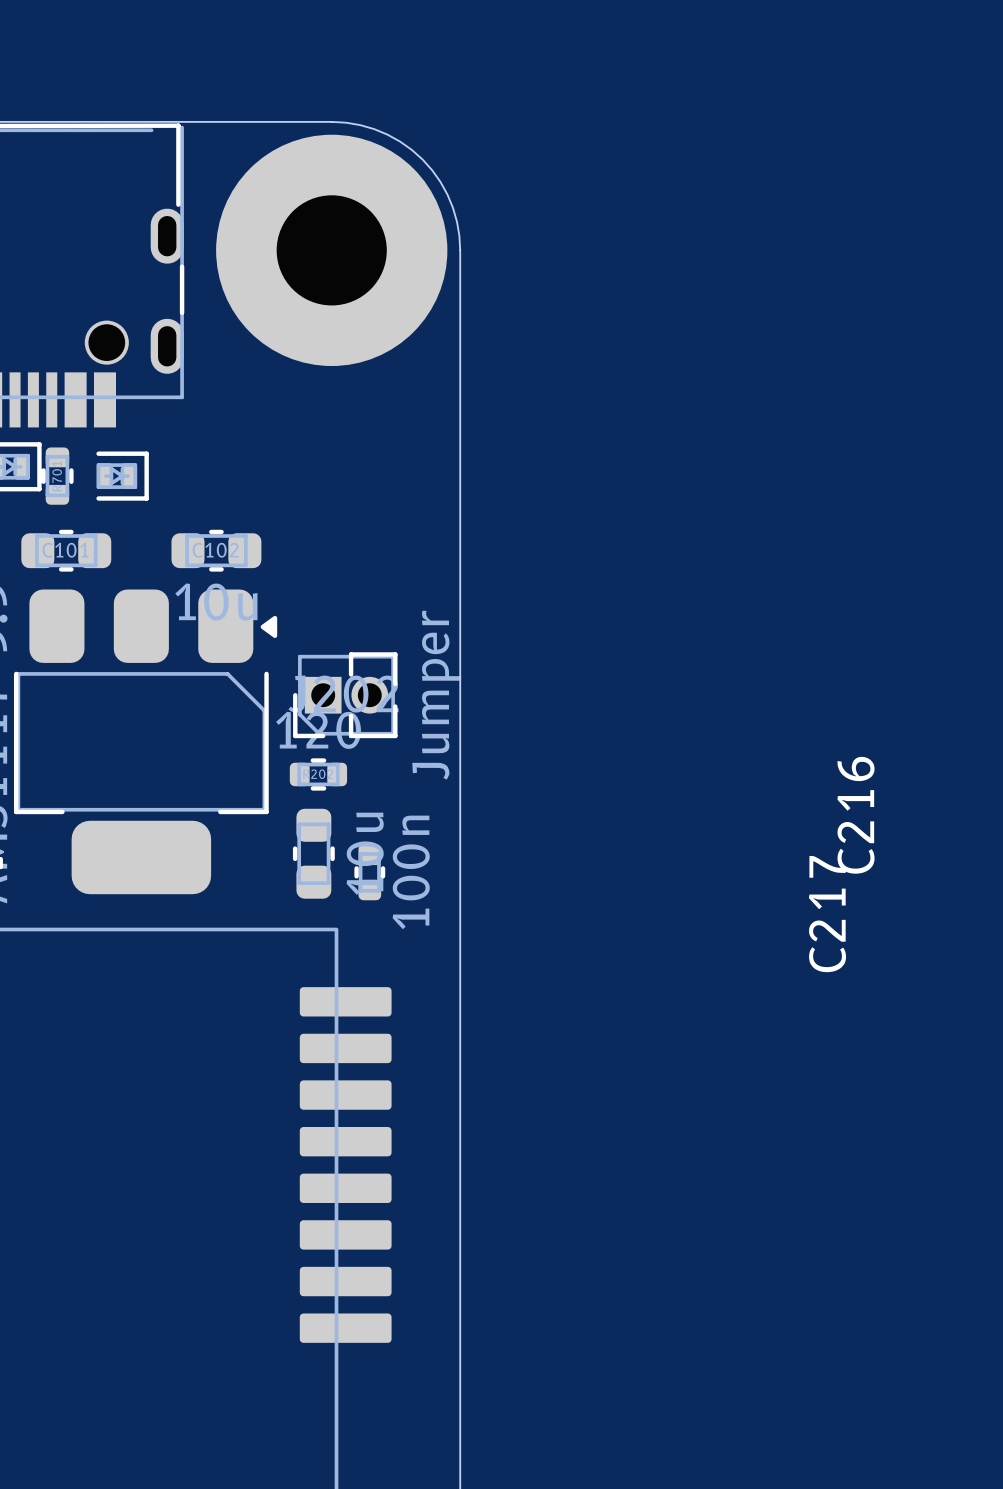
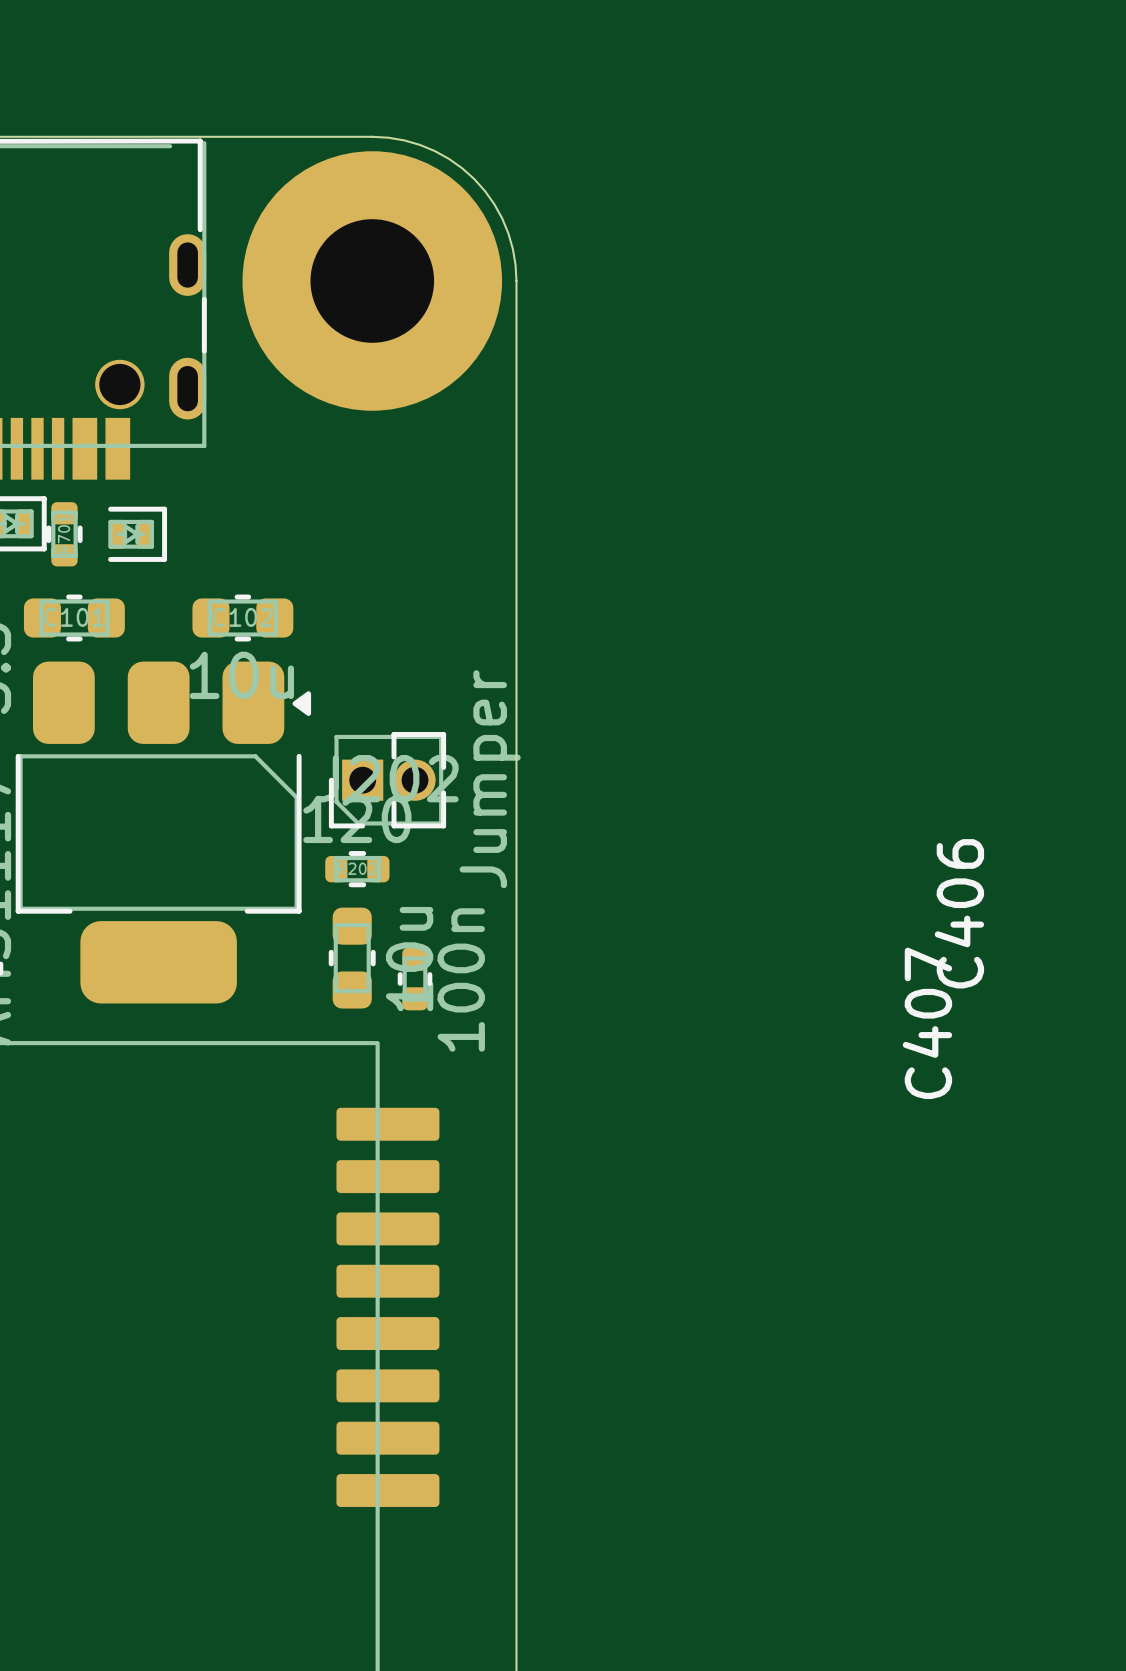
C216 name: C216 (855, 815) -> C406 (959, 913)
C217 name: C217 (827, 914) -> C407 (927, 1023)

